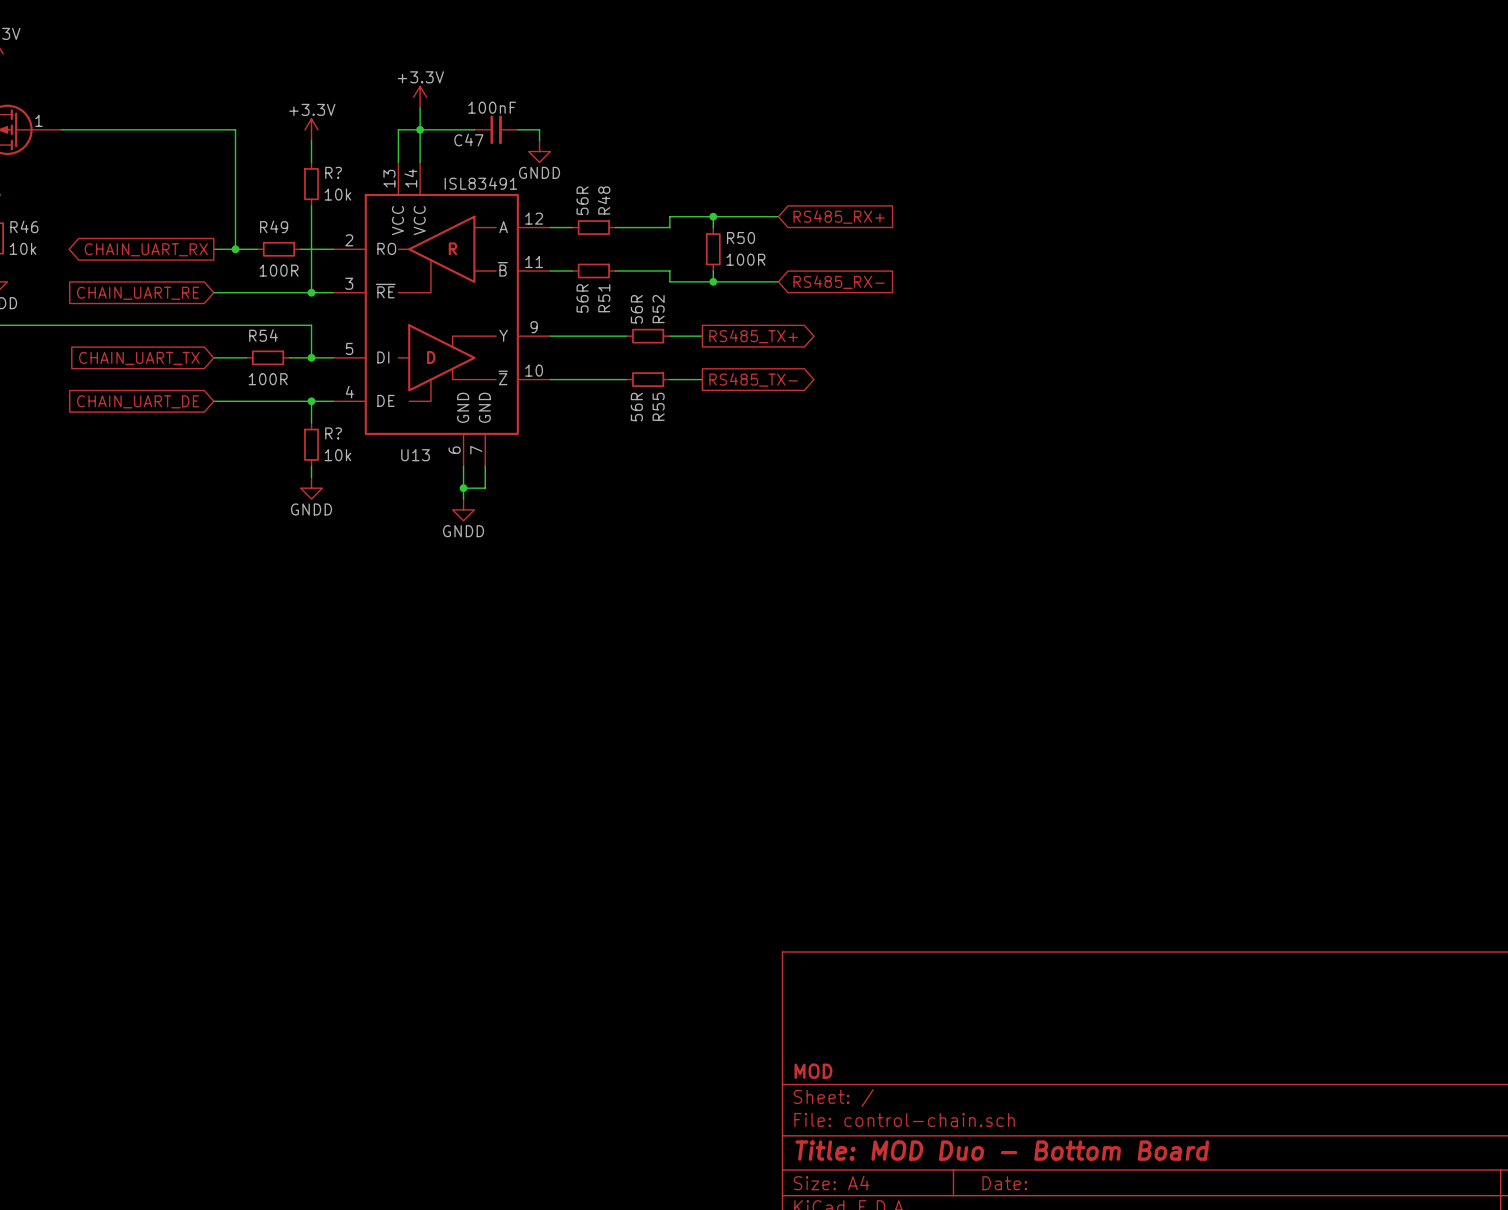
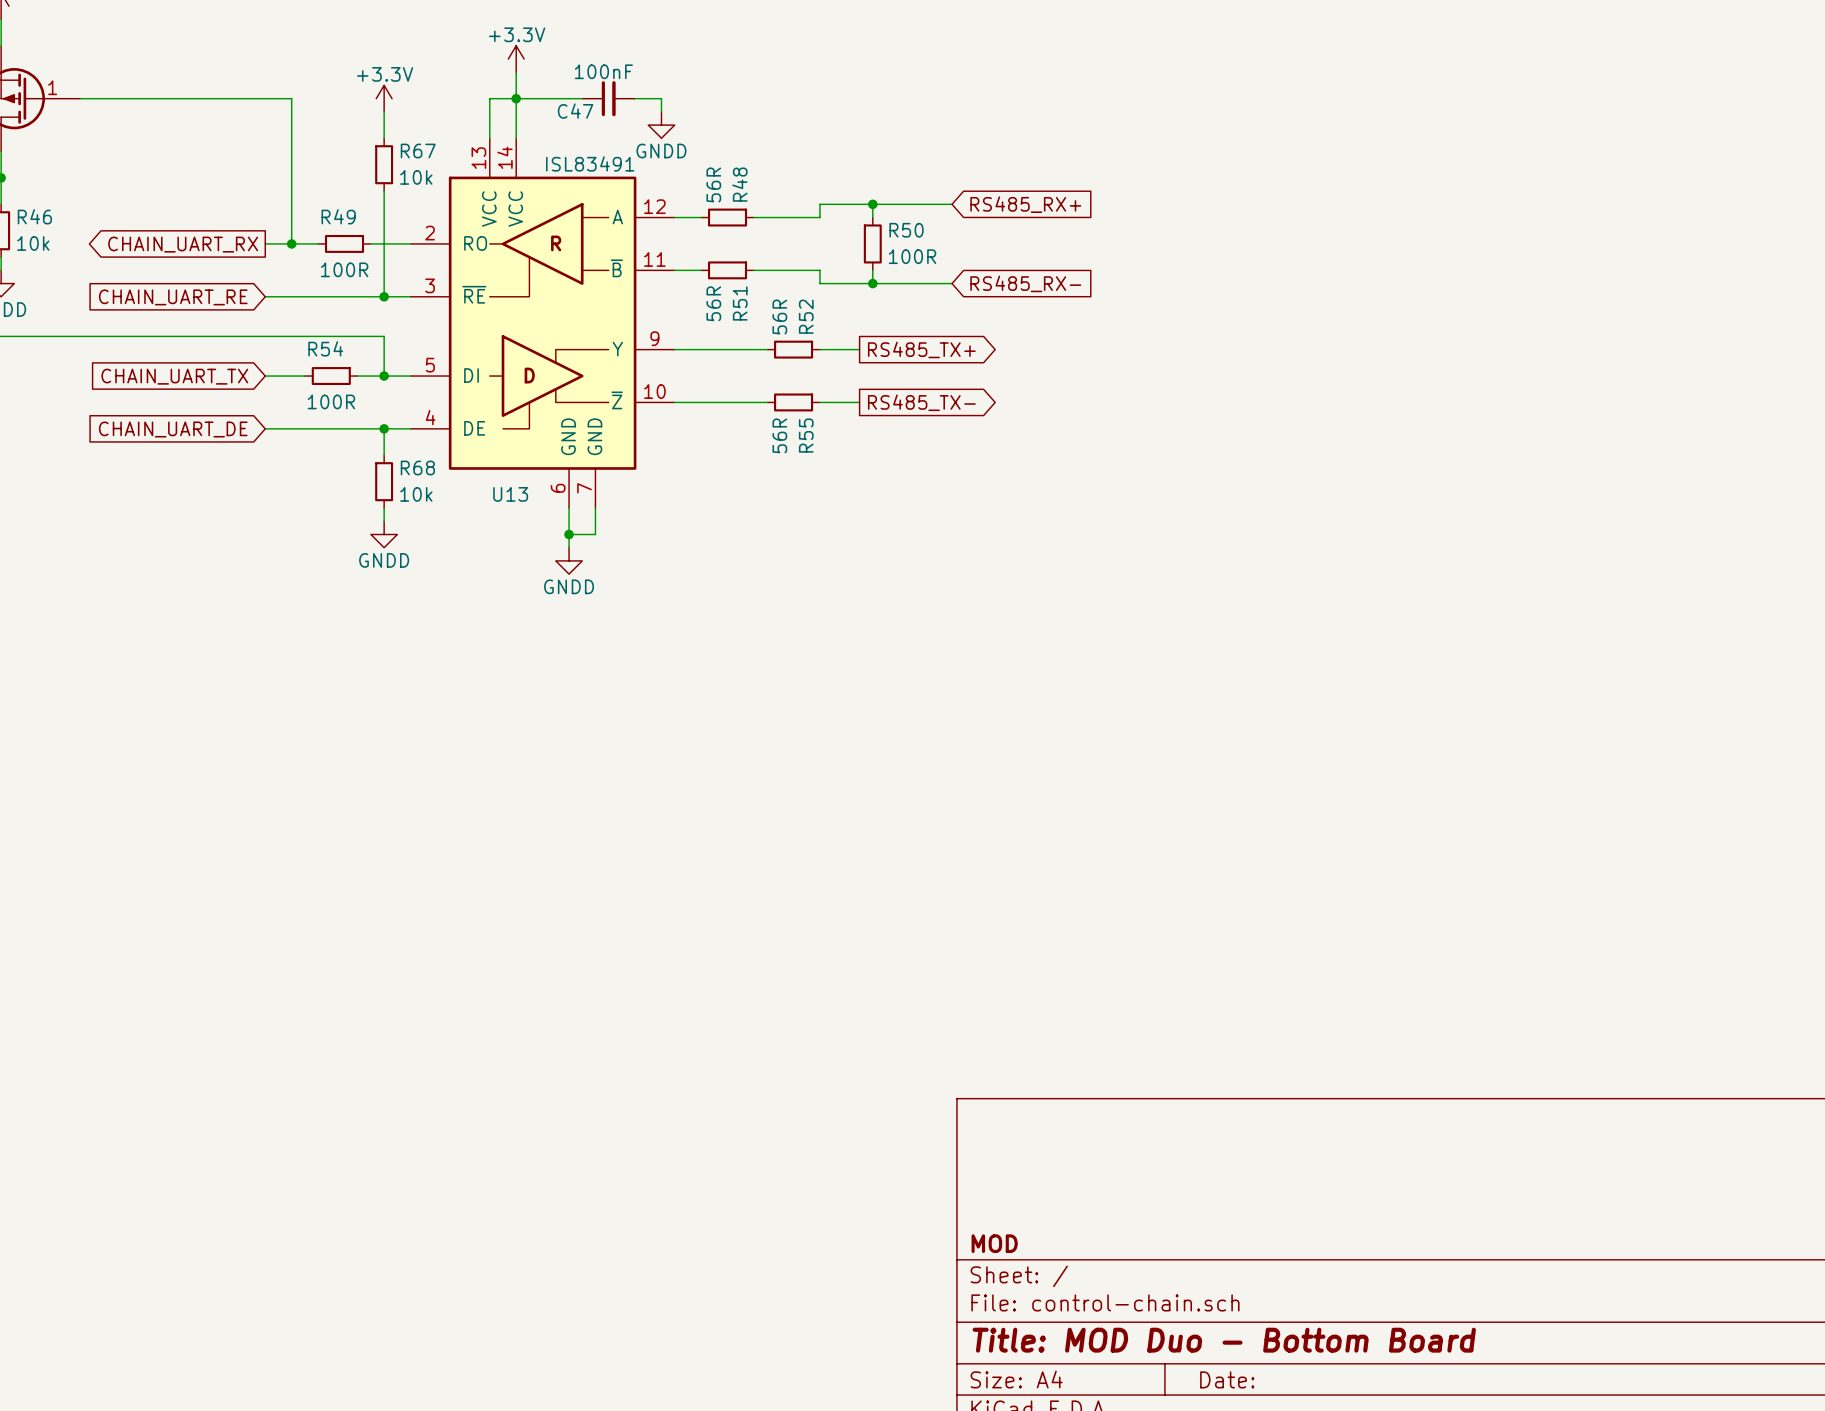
R? name: R? (333, 172) -> R67 (418, 151)
R? name: R? (333, 433) -> R68 (417, 467)

